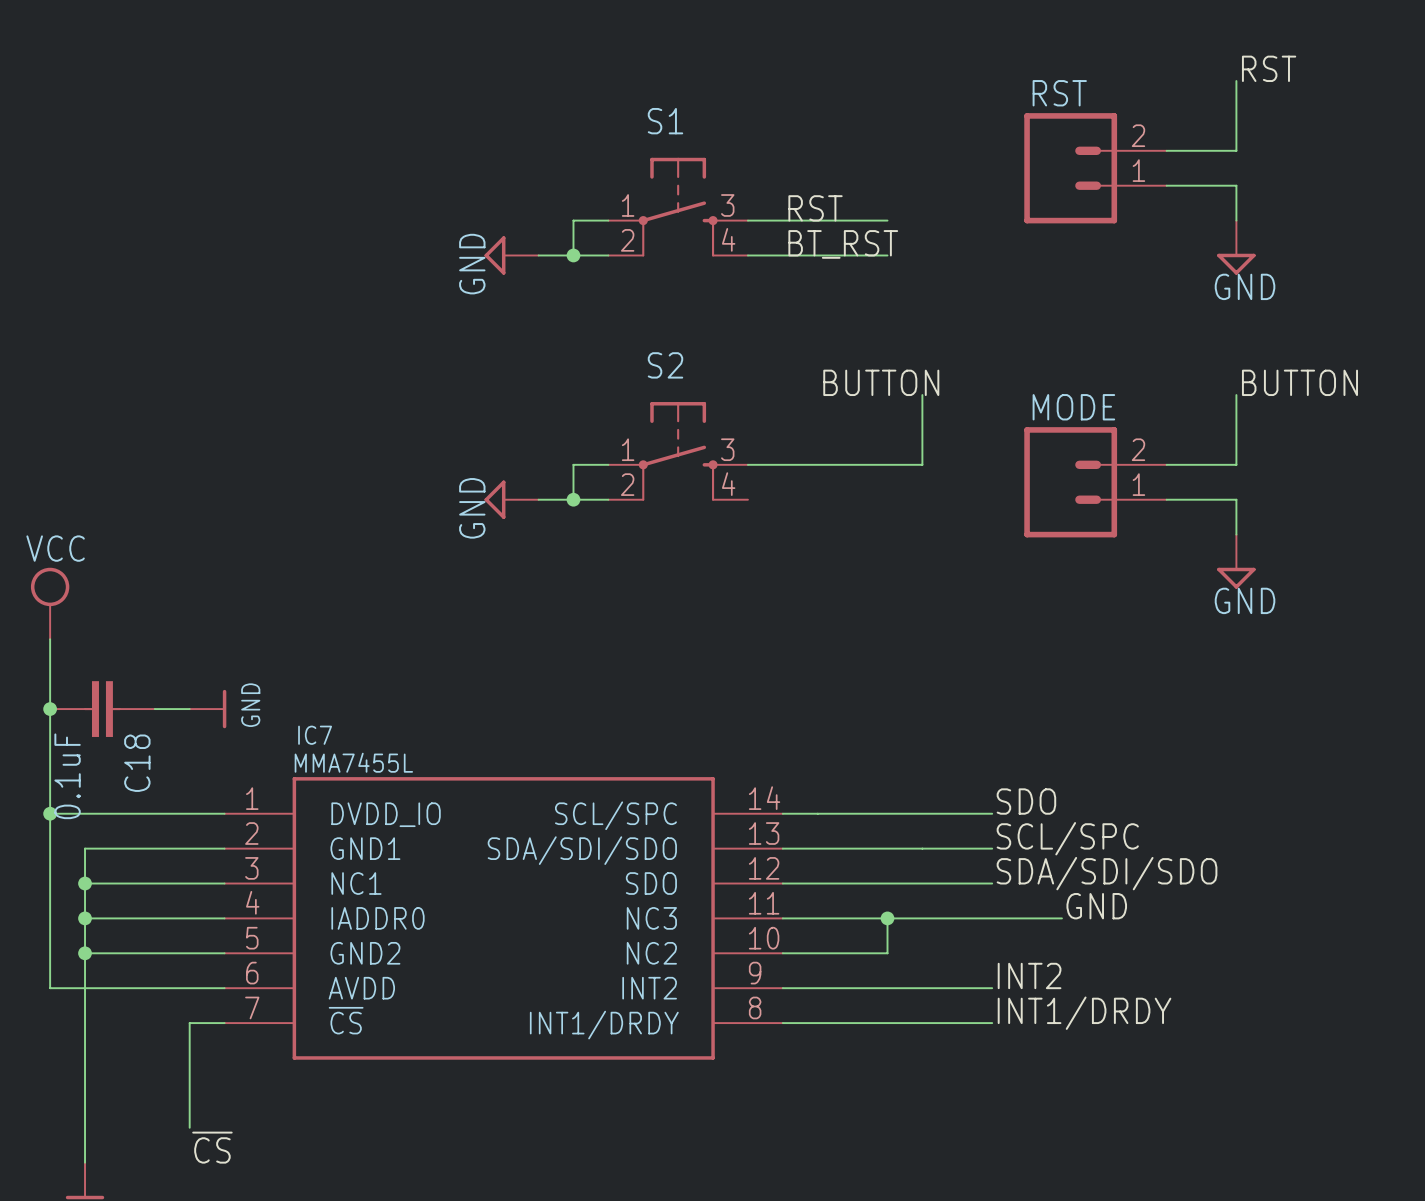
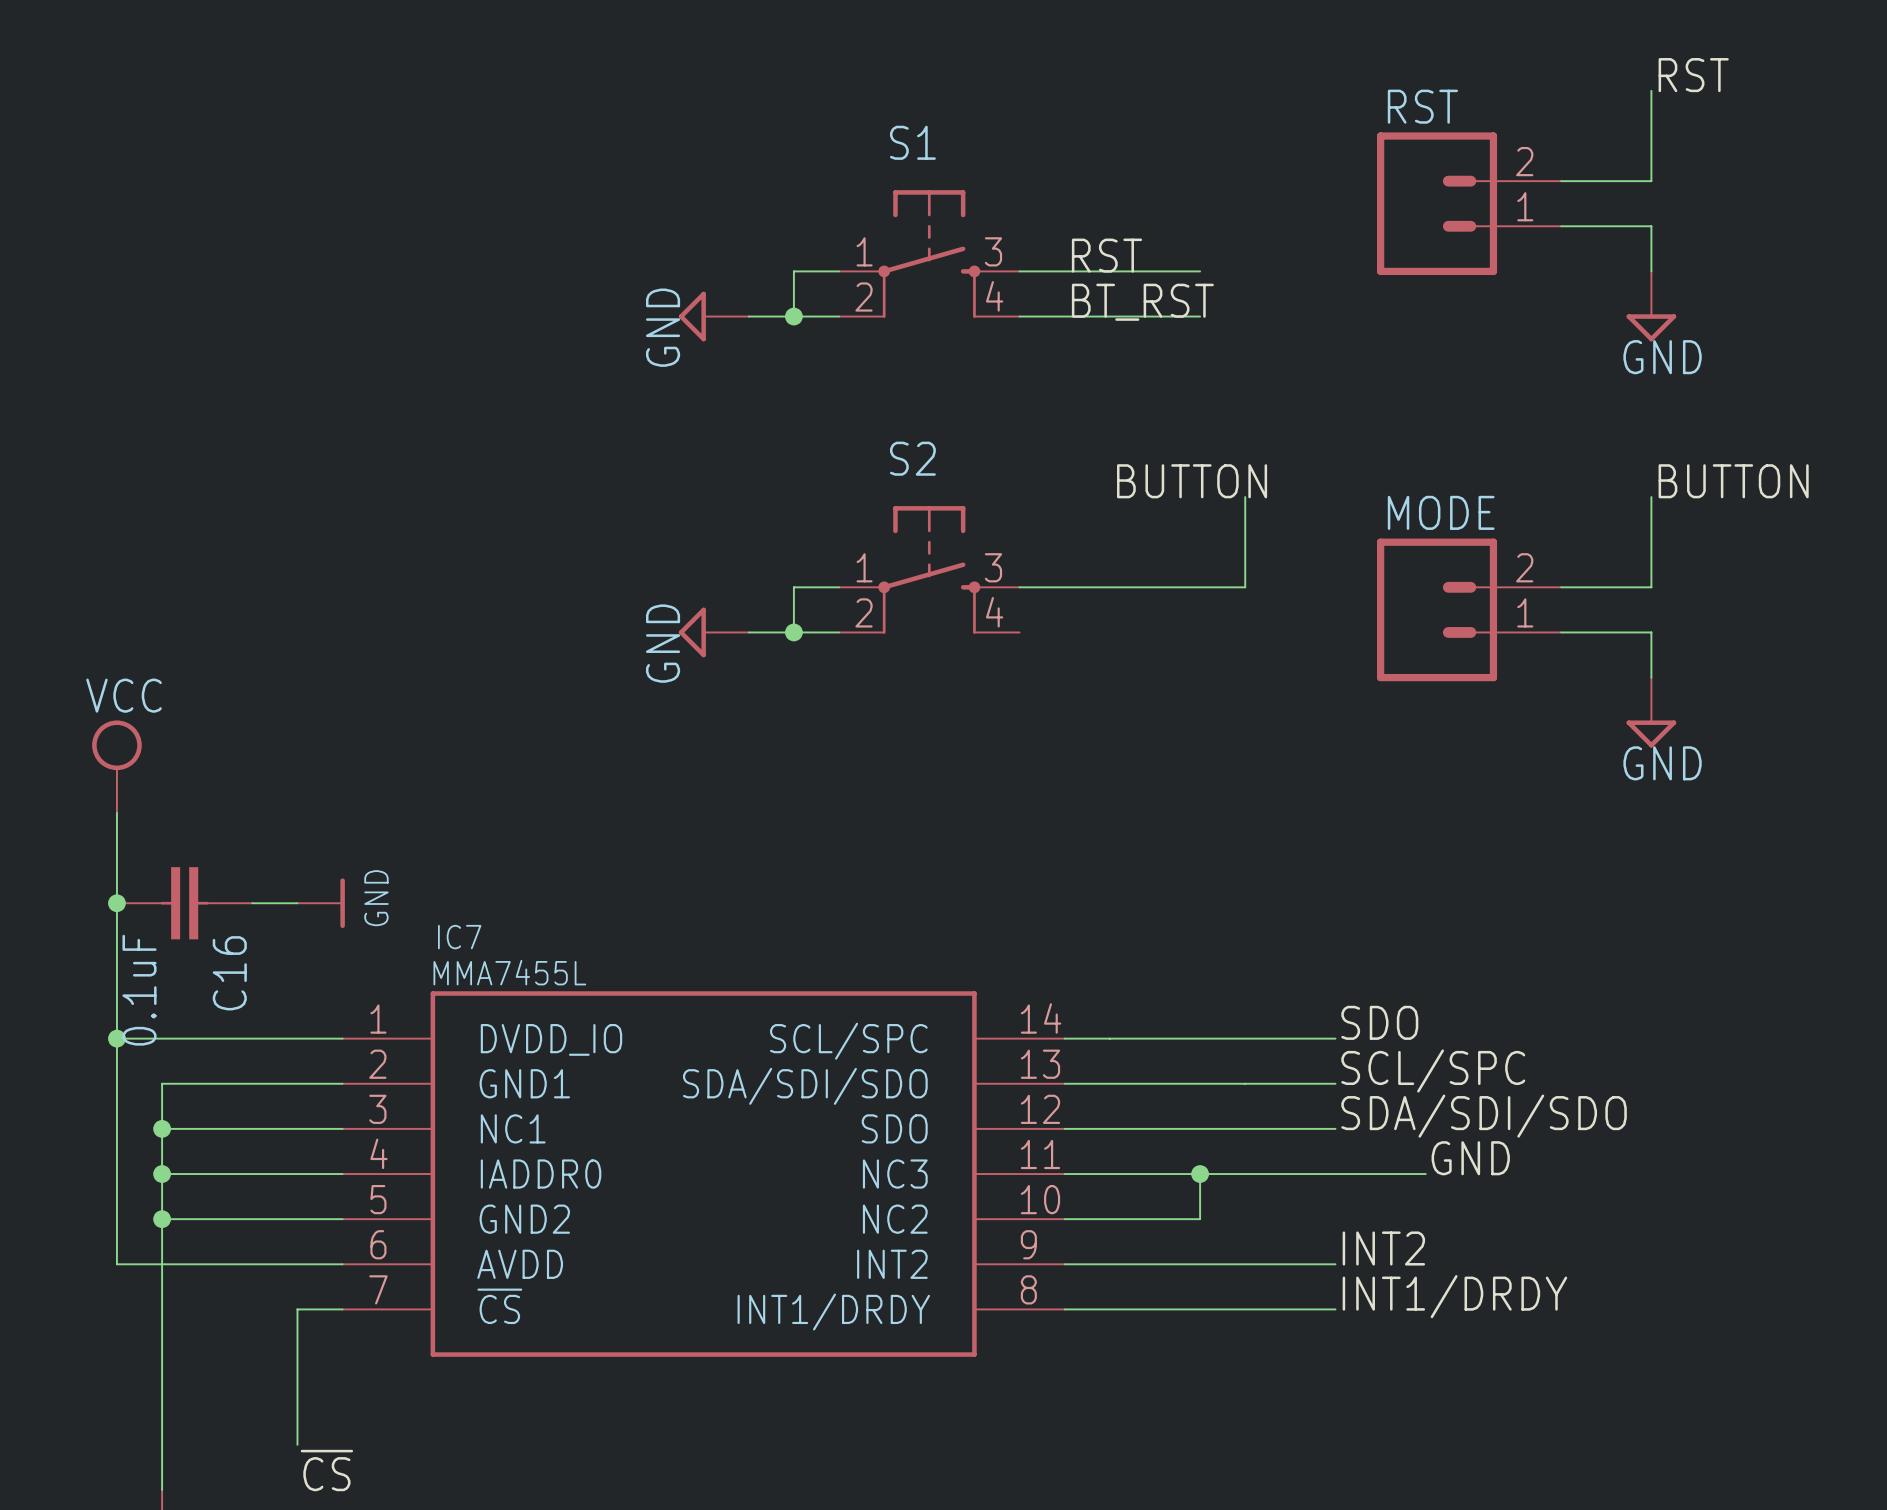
C18 name: C18 (137, 763) -> C16 (229, 973)

